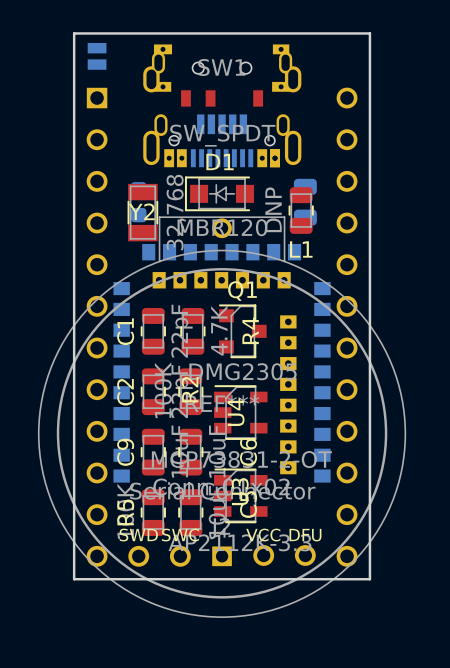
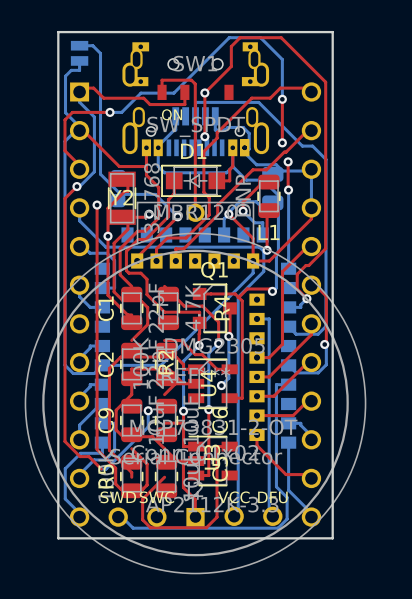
bottom track: none -> (79, 45) (92, 45) (100, 53) (100, 174) (120, 194) (155, 194) (177, 216)
bottom track: none -> (79, 60) (79, 70) (71, 70) (65, 76) (65, 112) (79, 126) (64, 141) (64, 365) (73, 373) (94, 373) (102, 365) (160, 365) (253, 273) (253, 261)
bottom track: none -> (79, 88) (79, 102) (94, 117) (94, 171) (79, 186) (76, 186)
top track: none -> (79, 88) (93, 88) (103, 98) (143, 98) (150, 104) (184, 104) (184, 92)
top track: none -> (311, 88) (280, 88) (270, 98) (251, 98) (217, 132) (217, 138) (203, 151) (203, 192) (209, 197) (209, 214) (186, 237) (167, 237) (156, 248) (156, 261)
top track: none -> (162, 92) (162, 80) (191, 80) (195, 84) (195, 208)
via: none -> (204, 92)
bottom track: none -> (282, 99) (282, 59) (260, 37) (229, 37) (173, 93) (140, 93) (121, 112) (110, 112)
top track: none -> (282, 99) (282, 142)
via: none -> (282, 99)
top track: none -> (110, 112) (72, 112) (64, 119) (64, 150) (79, 165)
via: none -> (110, 112)
text: none -> ON (172, 114)
bottom track: none -> (175, 116) (175, 130) (158, 146) (158, 166) (164, 172) (226, 172) (232, 166)
bottom track: none -> (215, 116) (215, 130) (243, 127) (249, 133) (249, 149) (244, 153)
top track: none -> (79, 126) (119, 166) (146, 166)
top track: none -> (311, 126) (266, 169) (252, 169) (217, 205) (217, 215) (183, 248) (175, 248) (175, 261)
top track: none -> (204, 136) (204, 92) (231, 66) (231, 46) (240, 37) (281, 37) (325, 82) (325, 248) (297, 274) (297, 289) (306, 298)
via: none -> (204, 136)
bottom track: none -> (195, 140) (195, 102) (258, 102) (302, 146) (312, 146) (326, 159) (326, 326) (318, 334) (296, 334) (288, 326)
via: none -> (282, 142)
top track: none -> (146, 153) (146, 175) (158, 187) (158, 217) (145, 231) (137, 231) (120, 248) (120, 274) (131, 286)
top track: none -> (232, 153) (229, 180) (216, 180)
bottom track: none -> (245, 153) (256, 164) (276, 164) (282, 171) (305, 171)
top track: none -> (288, 161) (288, 190)
via: none -> (288, 161)
bottom track: none -> (232, 166) (246, 180) (263, 180) (278, 195) (276, 288) (272, 291)
bottom track: none -> (305, 171) (311, 176) (311, 204)
top track: none -> (127, 179) (127, 191) (124, 191) (107, 208) (107, 295) (127, 314) (131, 314)
top track: none -> (174, 180) (174, 193) (168, 199) (168, 216) (145, 239) (138, 239) (126, 251) (126, 270) (128, 273) (140, 273) (146, 279) (146, 294) (164, 312) (199, 312) (199, 345)
top track: none -> (263, 182) (243, 202) (243, 211)
top track: none -> (76, 186) (64, 198) (64, 441) (80, 456) (88, 456) (101, 469)
via: none -> (76, 186)
bottom track: none -> (288, 190) (288, 268)
via: none -> (288, 190)
bottom track: none -> (79, 204) (79, 220) (105, 247) (259, 247) (263, 251)
top track: none -> (311, 204) (311, 218) (269, 261) (253, 261) (253, 238) (228, 214)
top track: none -> (97, 205) (97, 449) (115, 468) (115, 484) (121, 489) (142, 489) (147, 485) (147, 464) (131, 448)
via: none -> (97, 205)
bottom track: none -> (263, 208) (256, 201) (239, 201) (224, 218) (224, 234)
top track: none -> (263, 210) (267, 214) (267, 250)
bottom track: none -> (243, 211) (254, 222) (262, 222) (262, 234)
via: none -> (243, 211)
top track: none -> (149, 214) (146, 217) (127, 217) (127, 229) (114, 243) (114, 291) (122, 300) (140, 300) (147, 307) (147, 324) (131, 340)
via: none -> (149, 214)
via: none -> (228, 214)
top track: none -> (177, 216) (137, 257) (137, 261)
via: none -> (177, 216)
via: none -> (107, 236)
bottom track: none -> (79, 242) (90, 253) (107, 253) (114, 260) (114, 288) (102, 288)
top track: none -> (311, 242) (282, 271) (282, 344) (269, 357) (257, 357)
via: none -> (267, 250)
bottom track: none -> (263, 251) (263, 271) (238, 297) (238, 508) (234, 512)
bottom track: none -> (79, 281) (79, 296) (90, 307) (102, 307)
top track: none -> (311, 281) (326, 296) (326, 342) (324, 344)
top track: none -> (164, 286) (184, 306) (202, 306) (218, 322) (218, 343)
top track: none -> (272, 291) (270, 289) (247, 289) (238, 297)
via: none -> (272, 291)
top track: none -> (199, 293) (235, 293) (238, 297)
top track: none -> (238, 297) (242, 301) (242, 398) (229, 398)
bottom track: none -> (306, 298) (300, 307) (288, 307)
via: none -> (306, 298)
top track: none -> (230, 308) (228, 336)
bottom track: none -> (257, 318) (269, 318) (269, 508) (272, 512)
top track: none -> (311, 320) (311, 334) (269, 376) (257, 376)
bottom track: none -> (228, 336) (228, 378) (221, 385)
via: none -> (228, 336)
top track: none -> (164, 340) (181, 340) (195, 354) (202, 354) (217, 369) (229, 369)
bottom track: none -> (218, 343) (208, 353) (208, 409)
via: none -> (218, 343)
bottom track: none -> (324, 344) (326, 364) (318, 372) (296, 372) (288, 365)
via: none -> (324, 344)
bottom track: none -> (102, 346) (90, 346) (79, 358)
bottom track: none -> (199, 345) (183, 361) (183, 411)
via: none -> (199, 345)
top track: none -> (311, 358) (273, 396) (257, 396)
top track: none -> (196, 369) (183, 369) (183, 364) (176, 357) (120, 357) (109, 368) (109, 450) (131, 472) (131, 477)
top track: none -> (183, 383) (168, 369) (131, 369) (131, 394) (116, 410) (116, 430) (122, 436) (152, 436) (176, 461) (196, 461)
top track: none -> (196, 383) (175, 383) (164, 394)
bottom track: none -> (102, 384) (90, 384) (79, 397)
bottom track: none -> (288, 384) (276, 384) (276, 486) (287, 497) (287, 519) (278, 528) (133, 528) (118, 513)
via: none -> (221, 385)
top track: none -> (311, 397) (293, 415) (257, 415)
bottom track: none -> (102, 404) (79, 425) (79, 435)
top track: none -> (208, 409) (208, 475) (196, 475)
via: none -> (208, 409)
bottom track: none -> (148, 410) (148, 426) (106, 469) (101, 469)
via: none -> (148, 410)
top track: none -> (183, 411) (183, 446) (196, 446)
via: none -> (183, 411)
bottom track: none -> (102, 423) (114, 423) (114, 451) (105, 459) (94, 459) (79, 474)
top track: none -> (164, 423) (183, 423)
bottom track: none -> (288, 423) (300, 423) (311, 435)
top track: none -> (257, 434) (257, 445) (286, 474) (311, 474)
bottom track: none -> (102, 442) (102, 453) (80, 453) (65, 468) (65, 498) (79, 513)
bottom track: none -> (288, 442) (288, 490) (311, 513)
top track: none -> (229, 446) (217, 446) (217, 517) (206, 527) (150, 527) (142, 519) (142, 499) (164, 477)
top track: none -> (183, 461) (183, 487) (195, 499) (195, 513)

